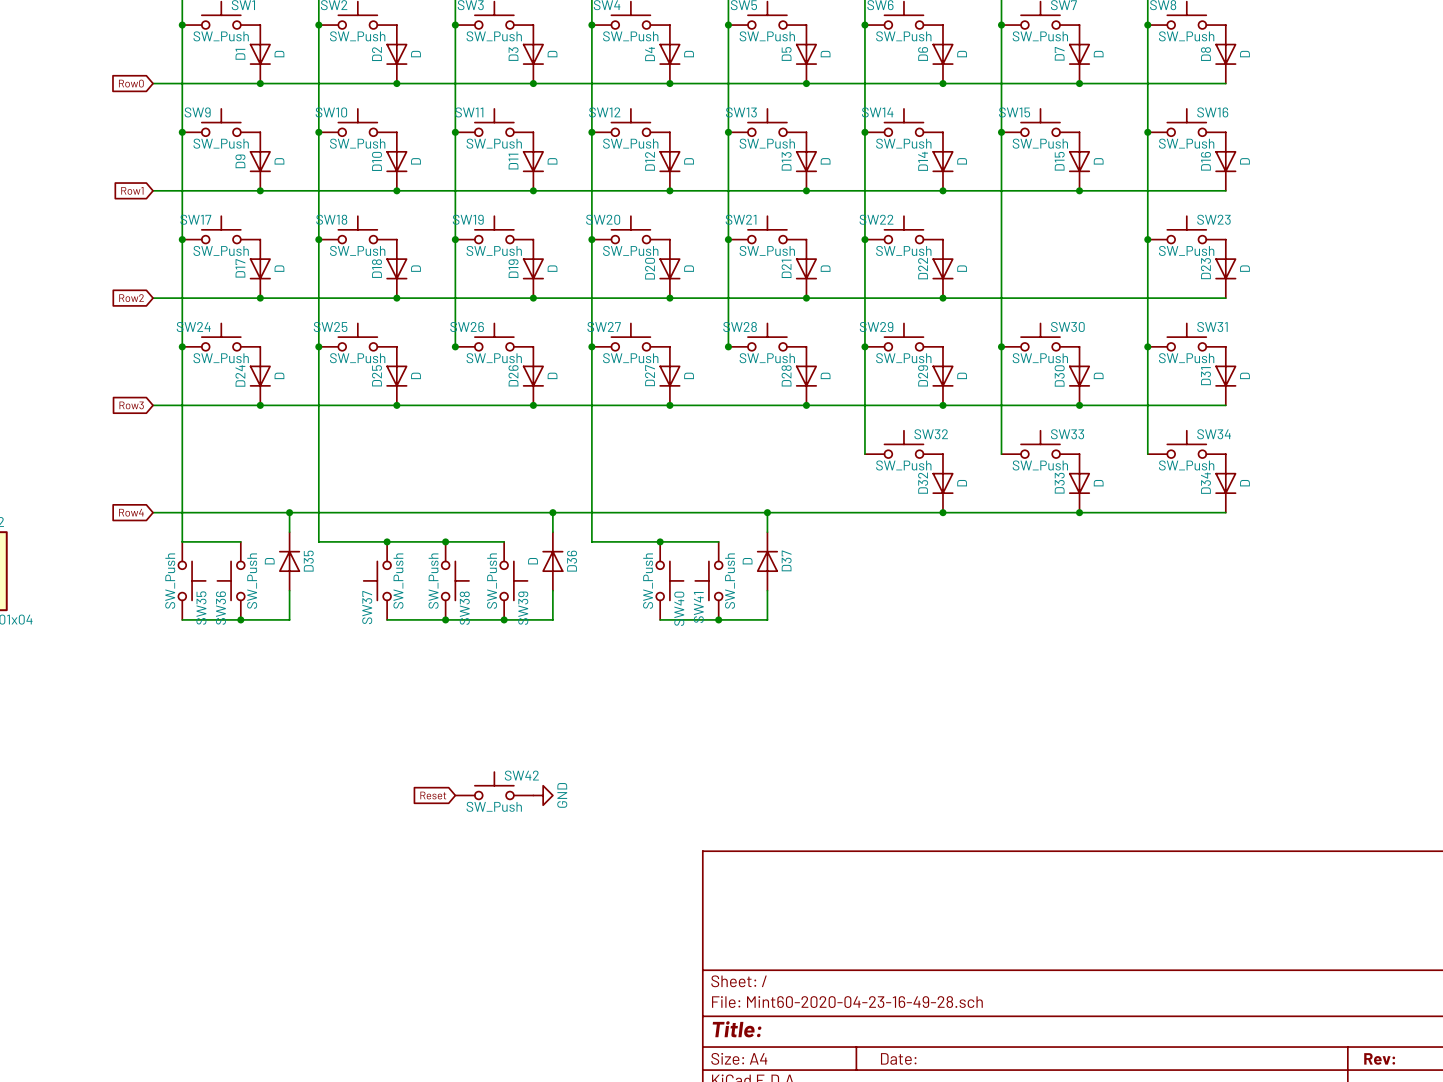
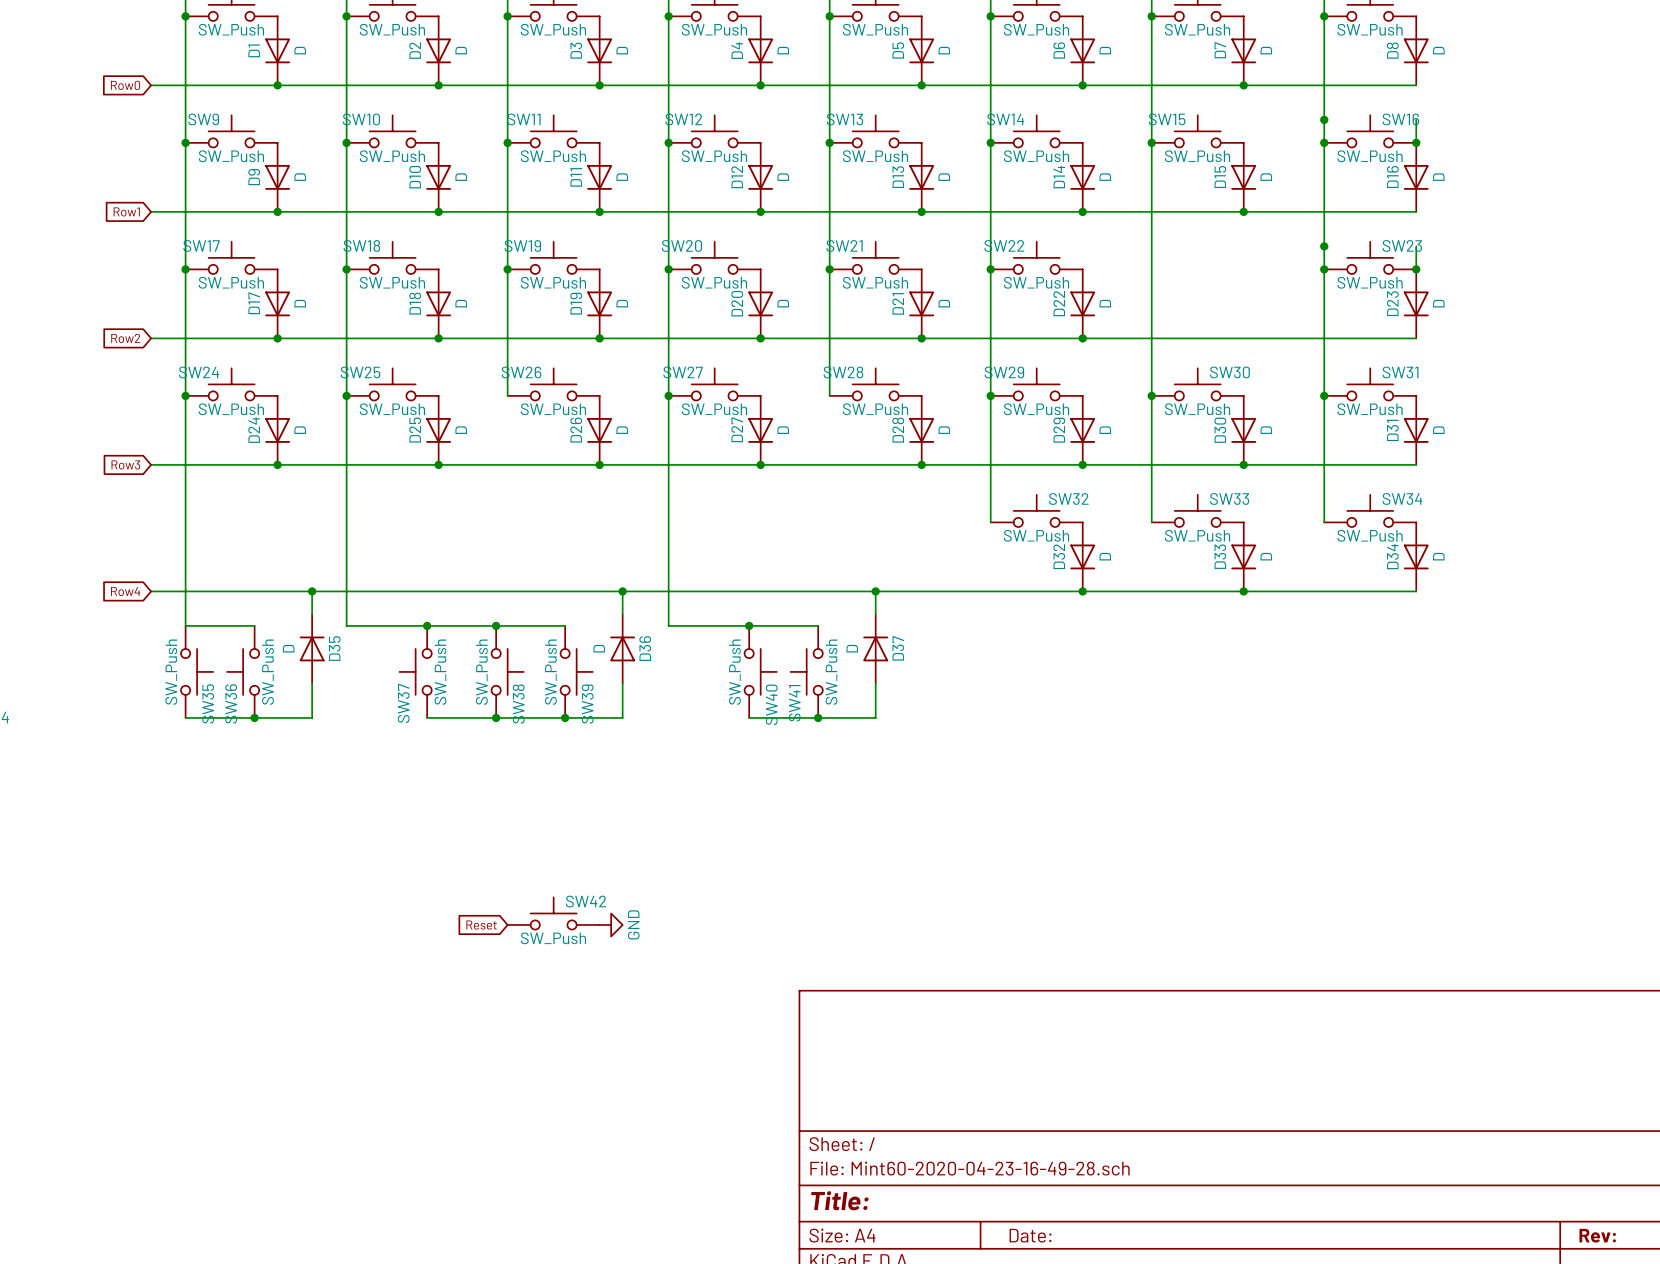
junction: none -> (1324, 119)
wire: none -> (1416, 119) (1416, 142)
junction: none -> (1416, 142)
junction: none -> (1324, 246)
wire: none -> (1416, 246) (1416, 269)
junction: none -> (1416, 269)
junction: (455, 346) -> none
junction: (728, 346) -> none

